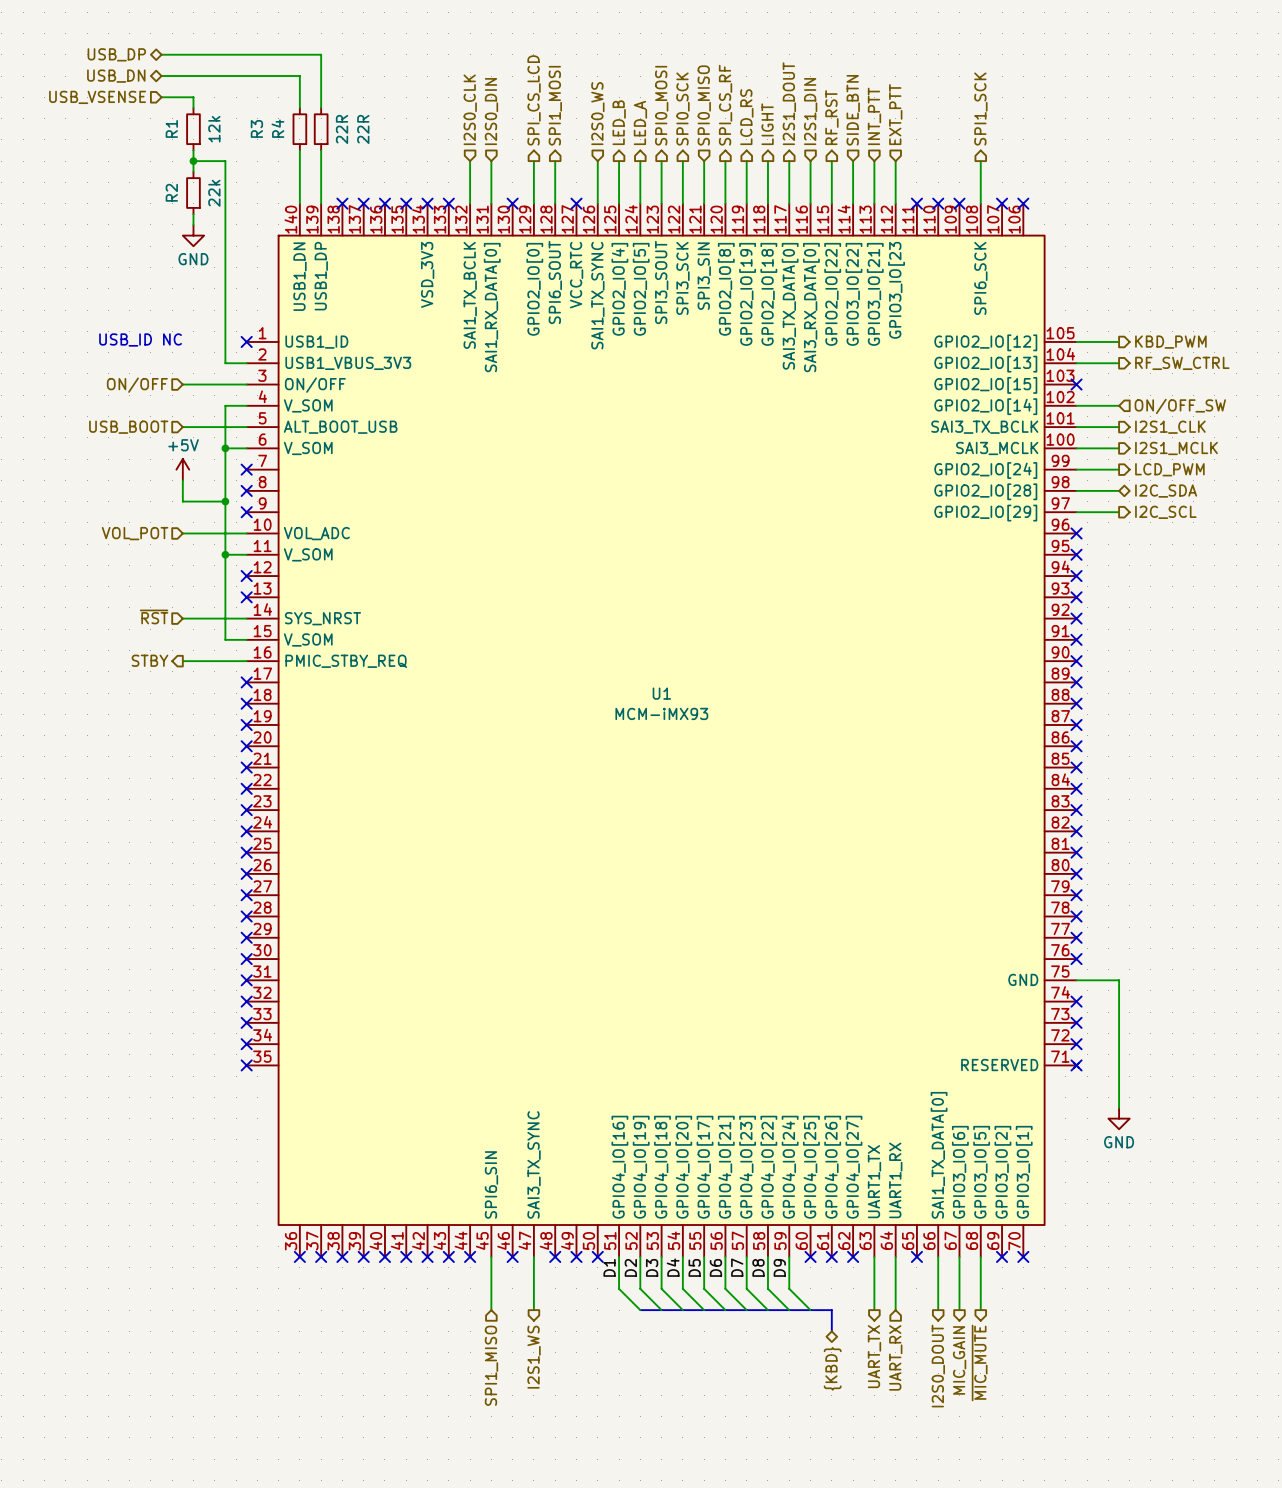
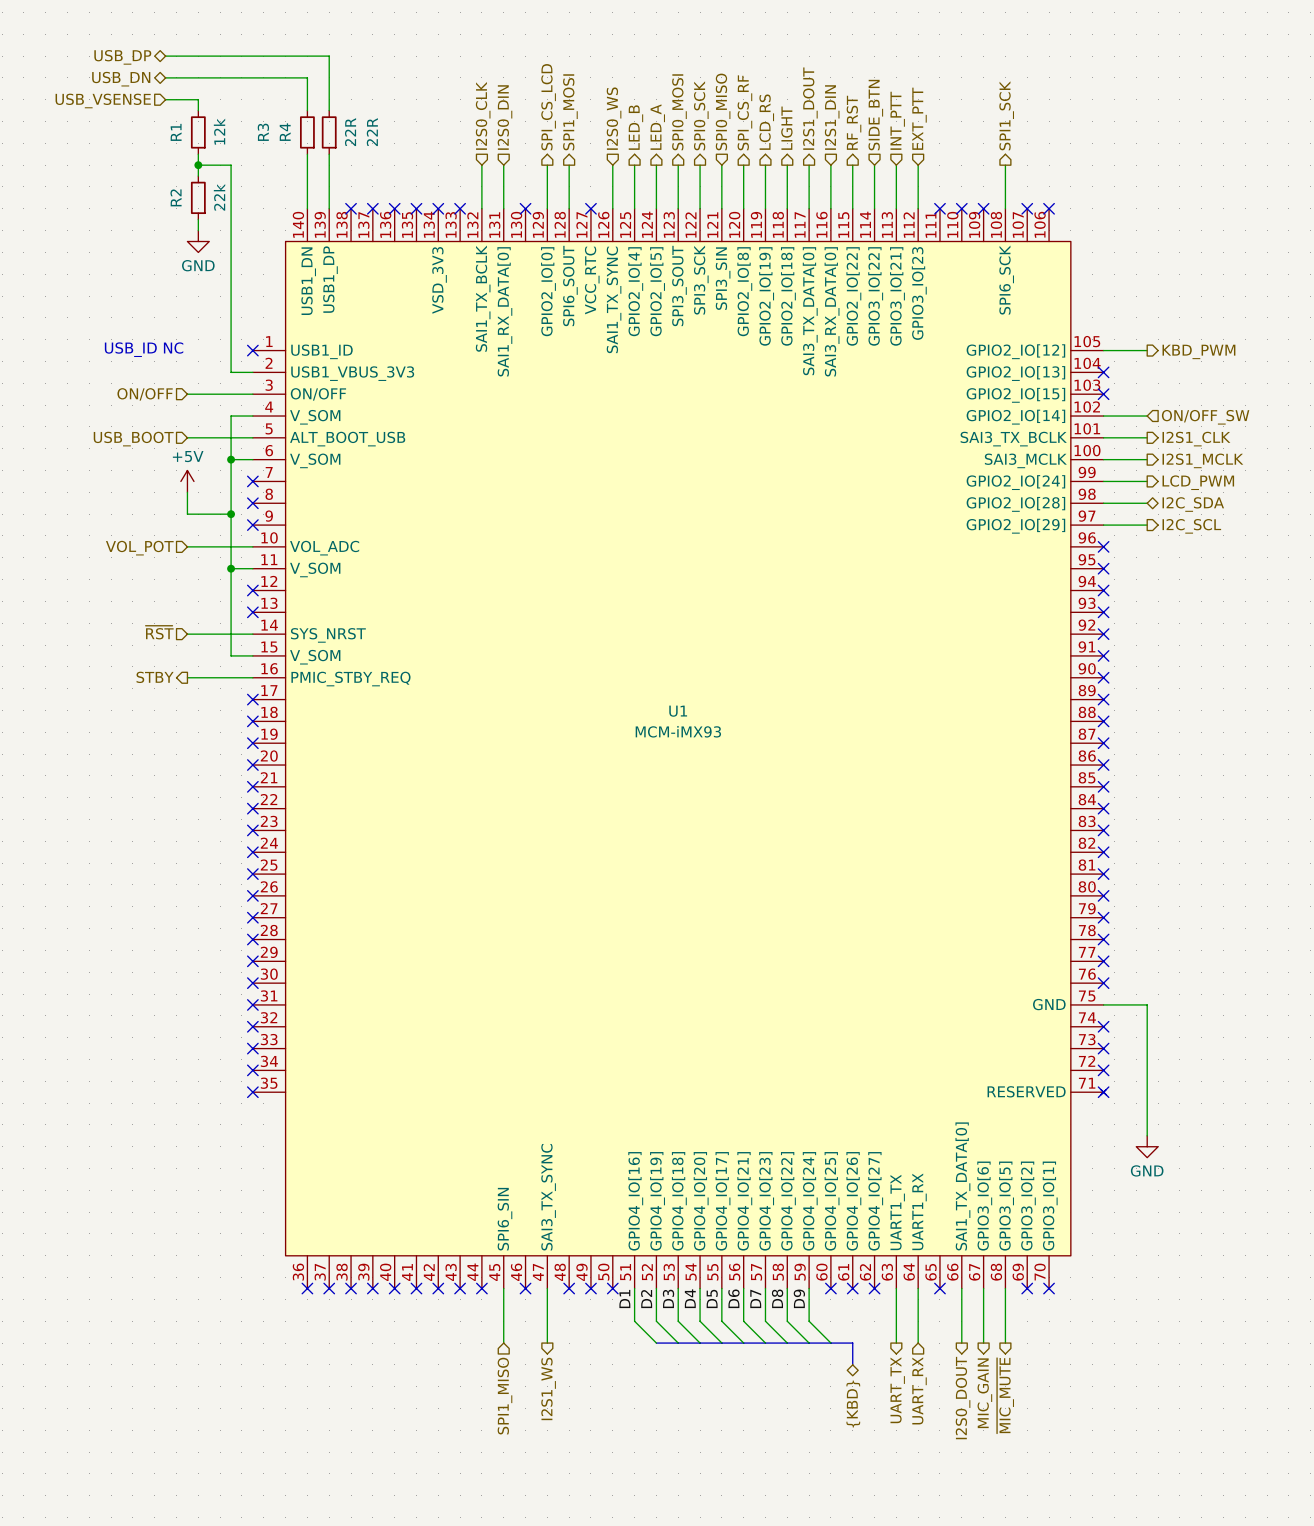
wire: (1076, 363) (1119, 363) -> none
no-connect mark: none -> (1103, 372)
hierarchical label: RF_SW_CTRL (1182, 363) -> none

